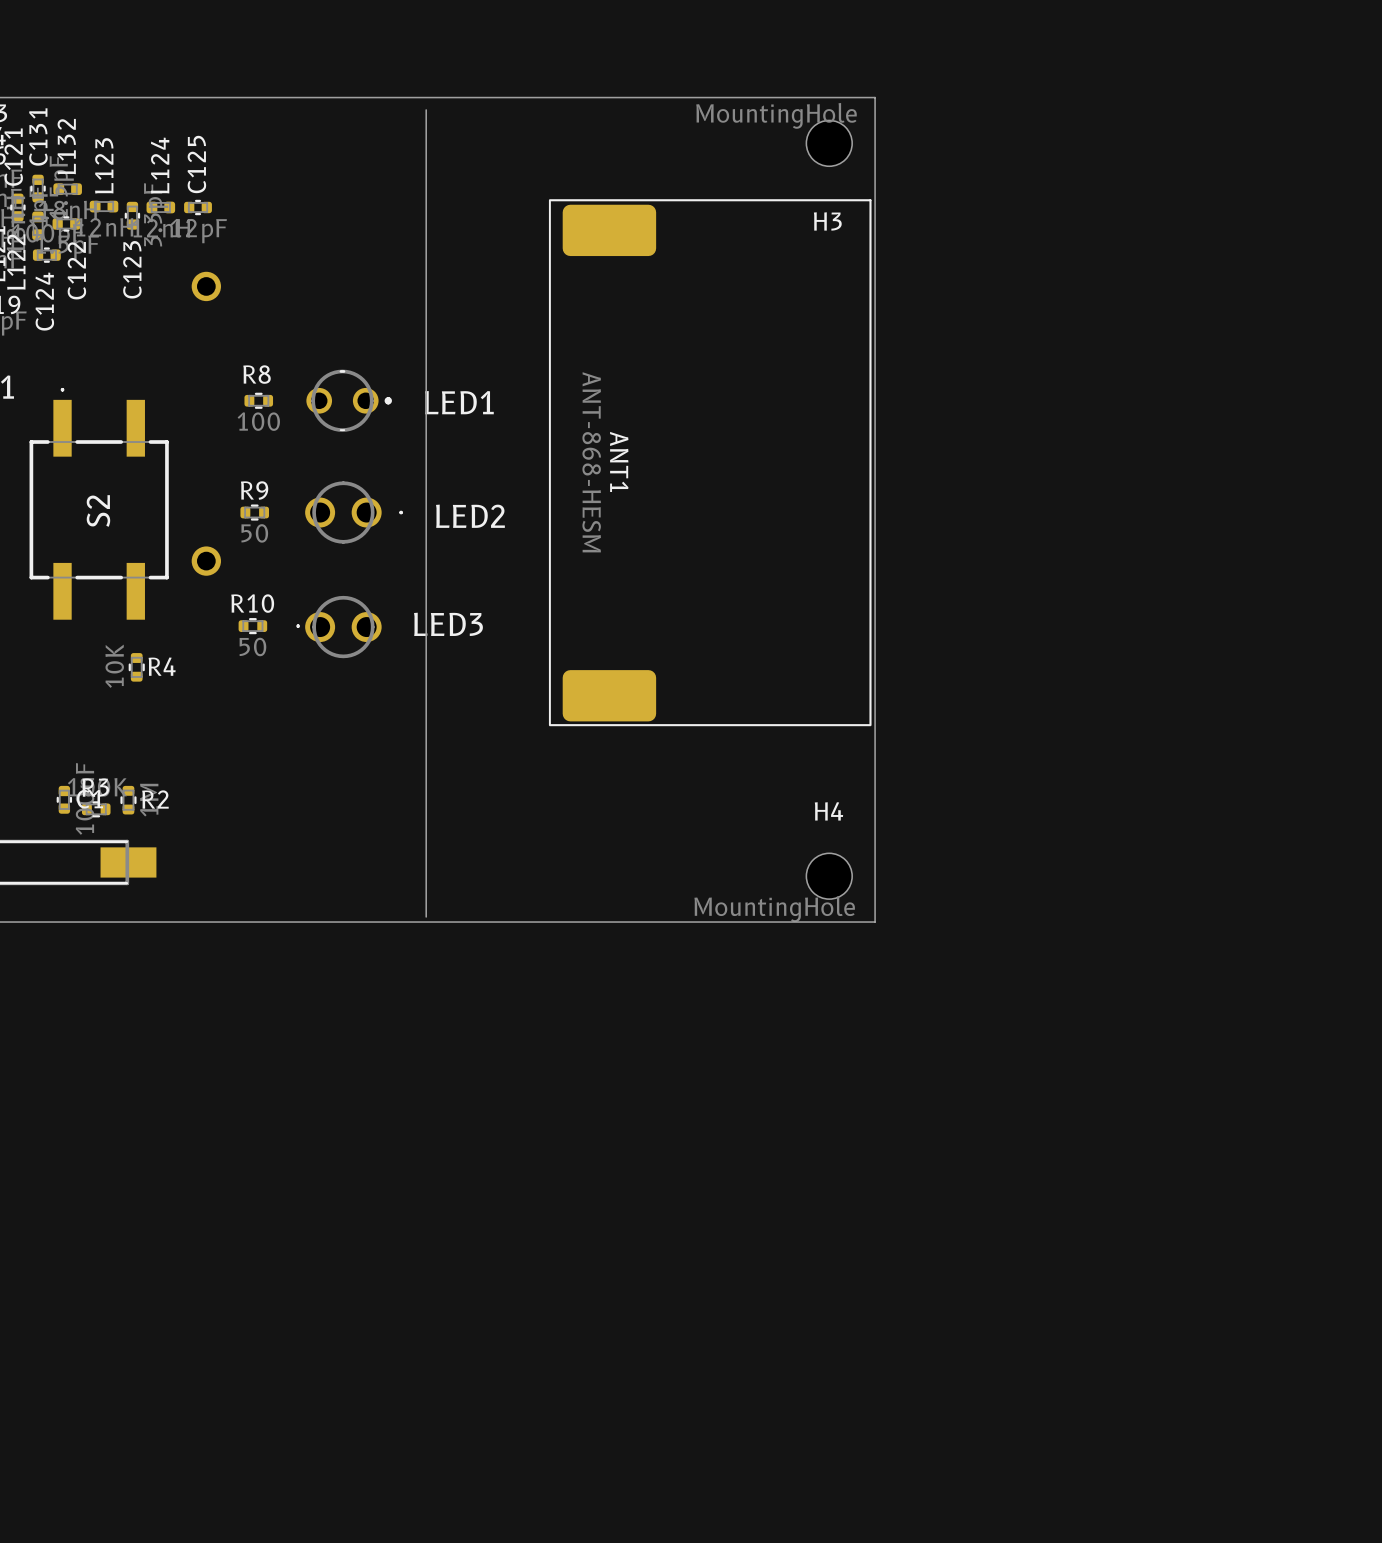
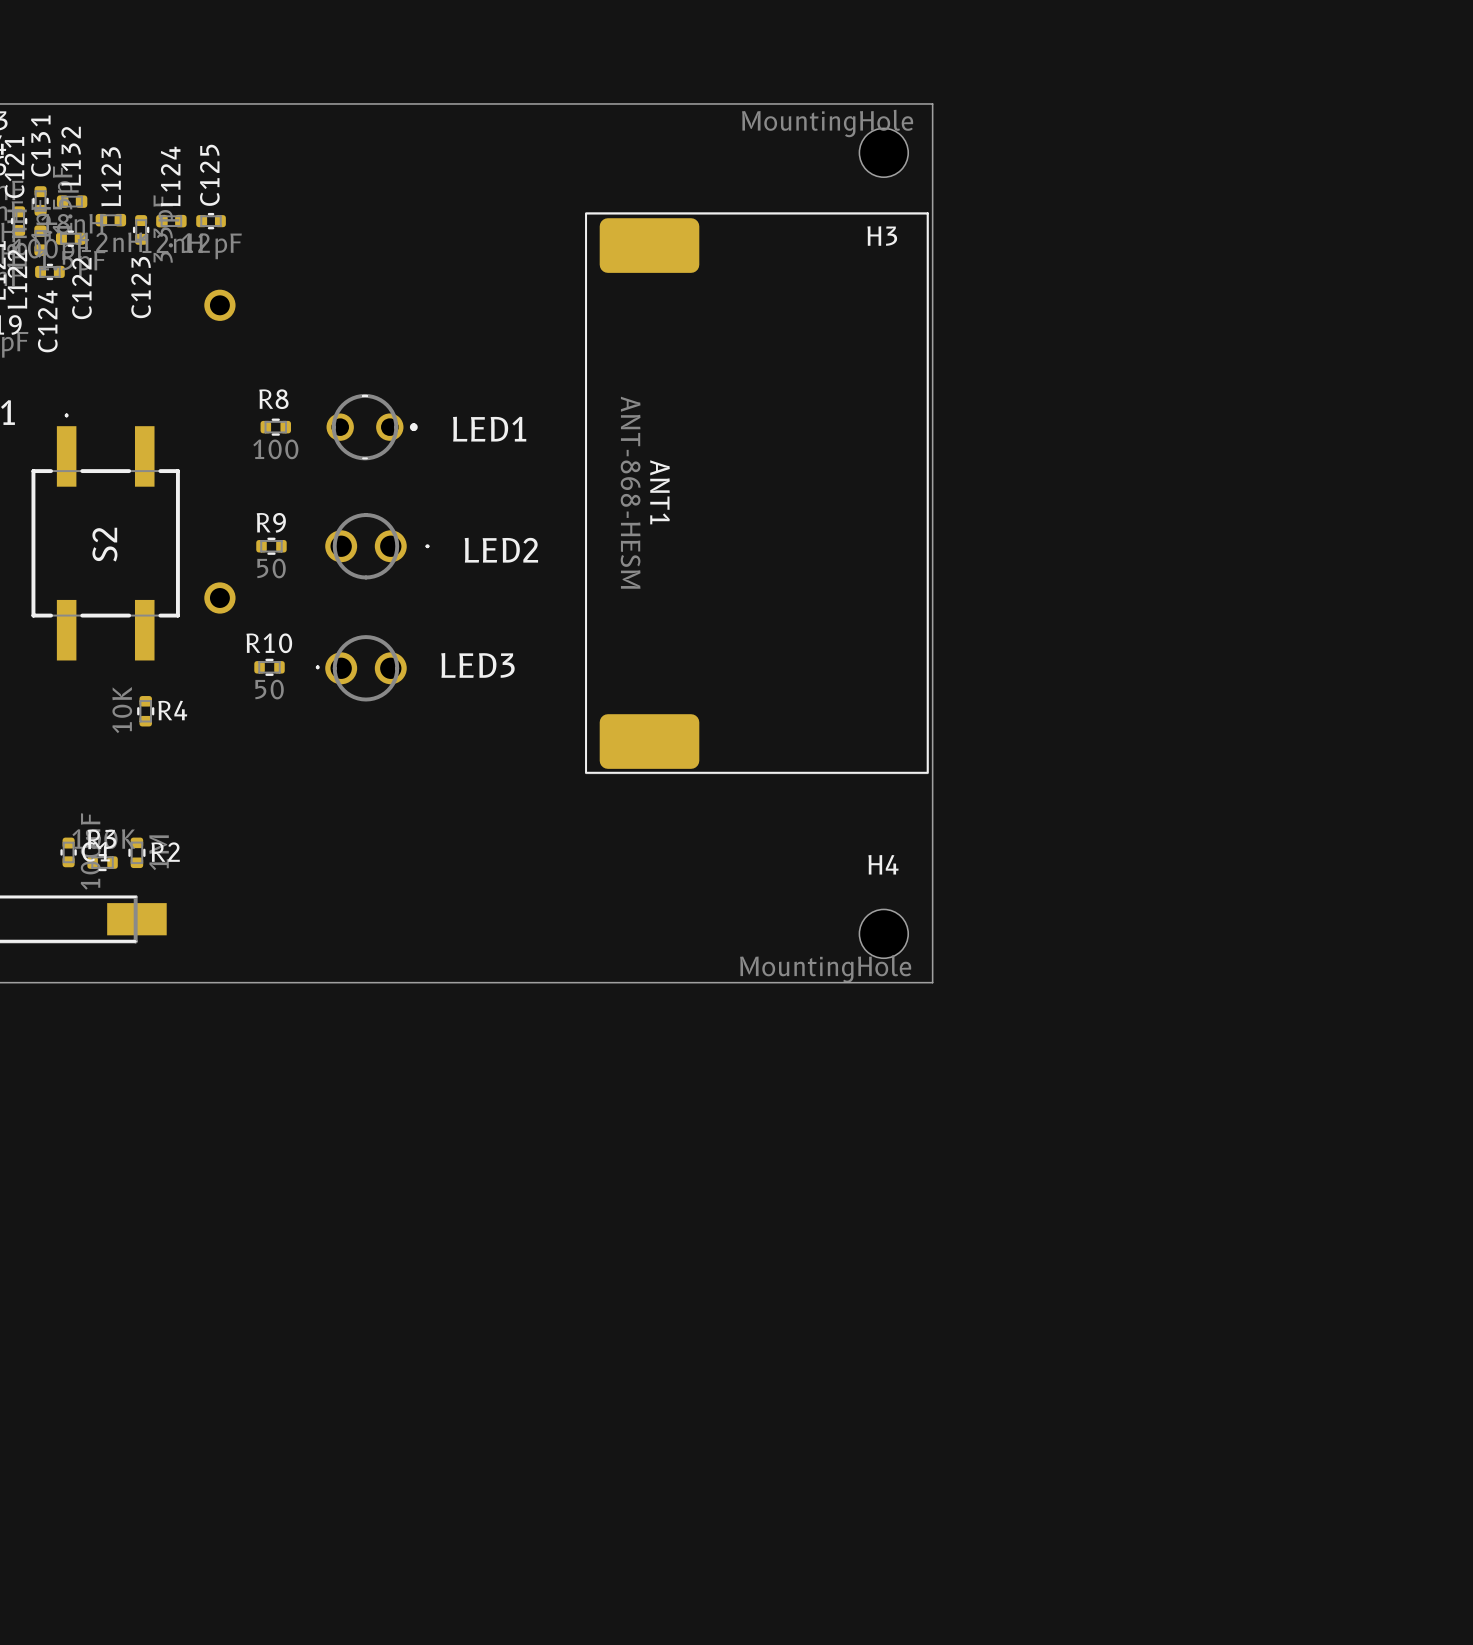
board edge: (426, 109) (426, 916) -> none

